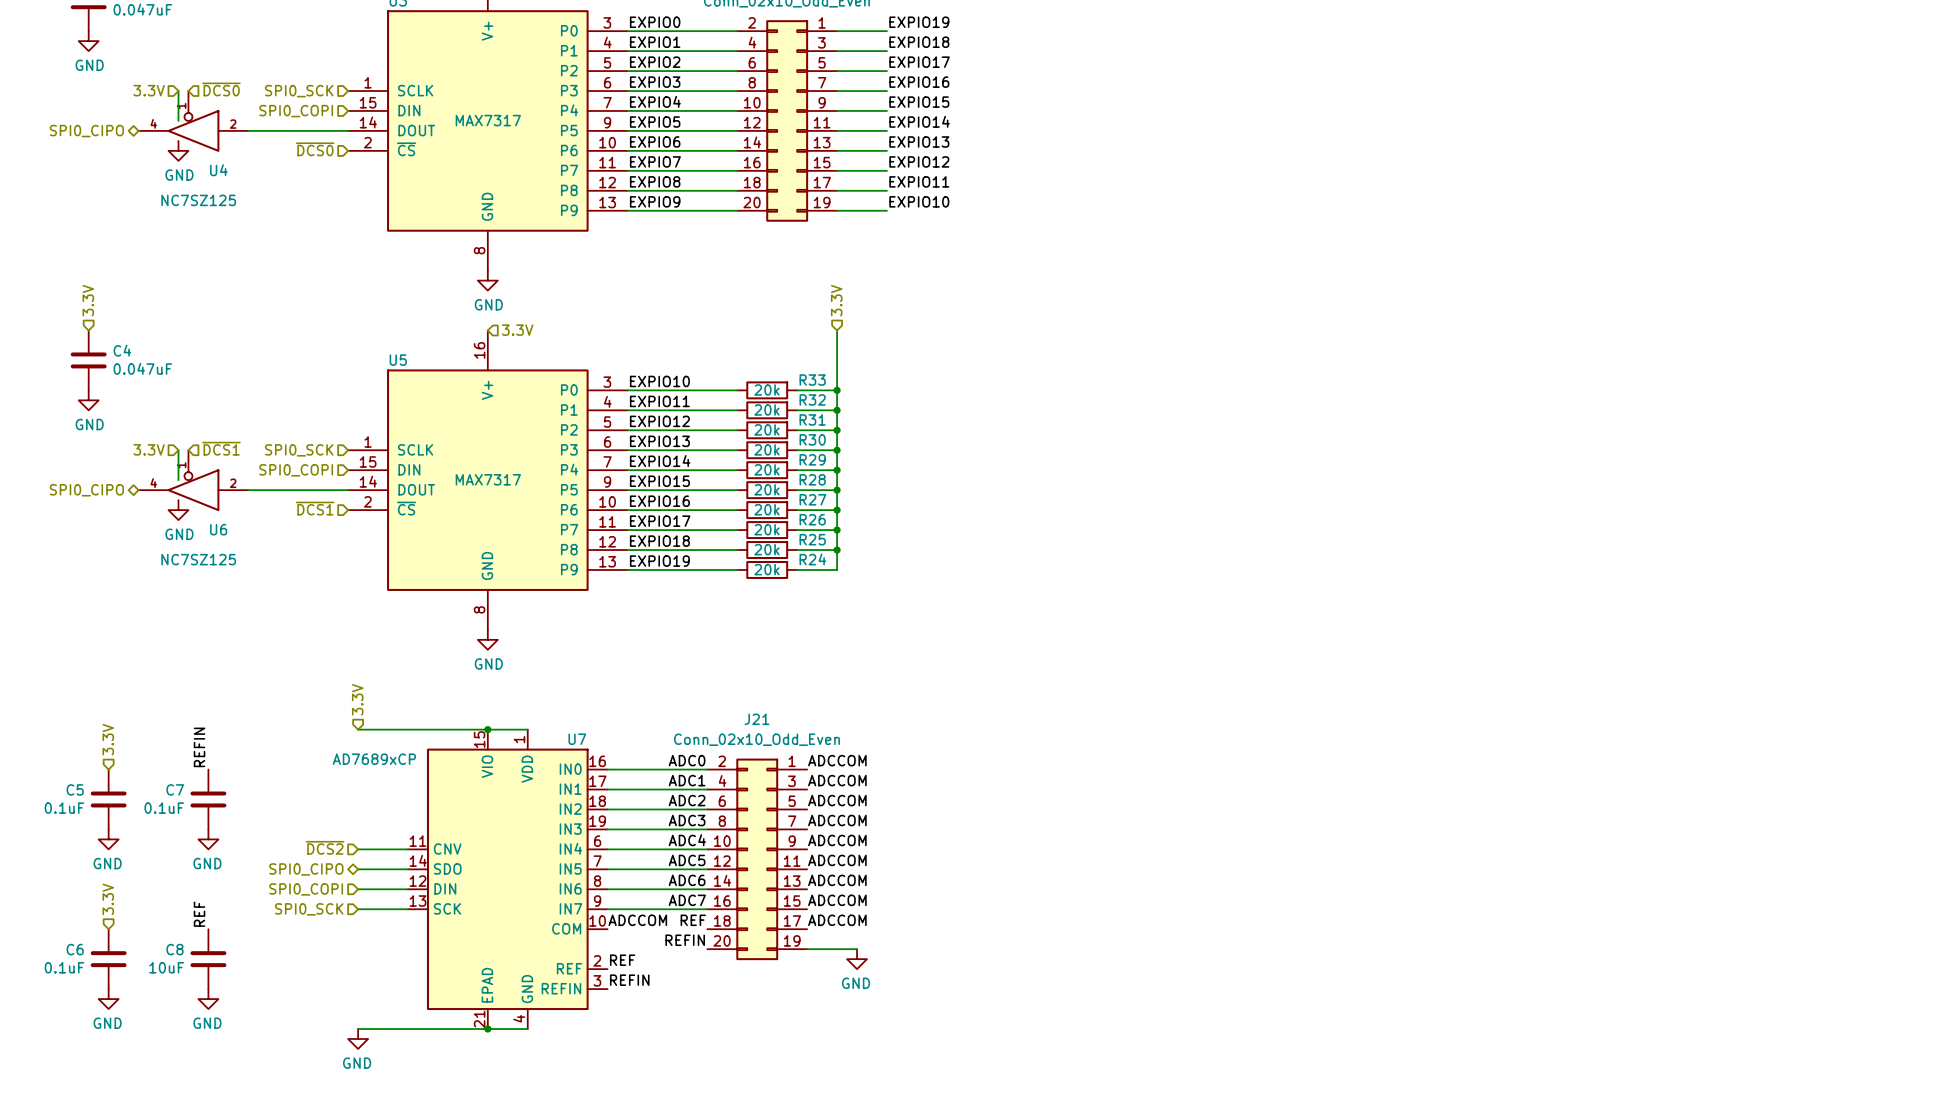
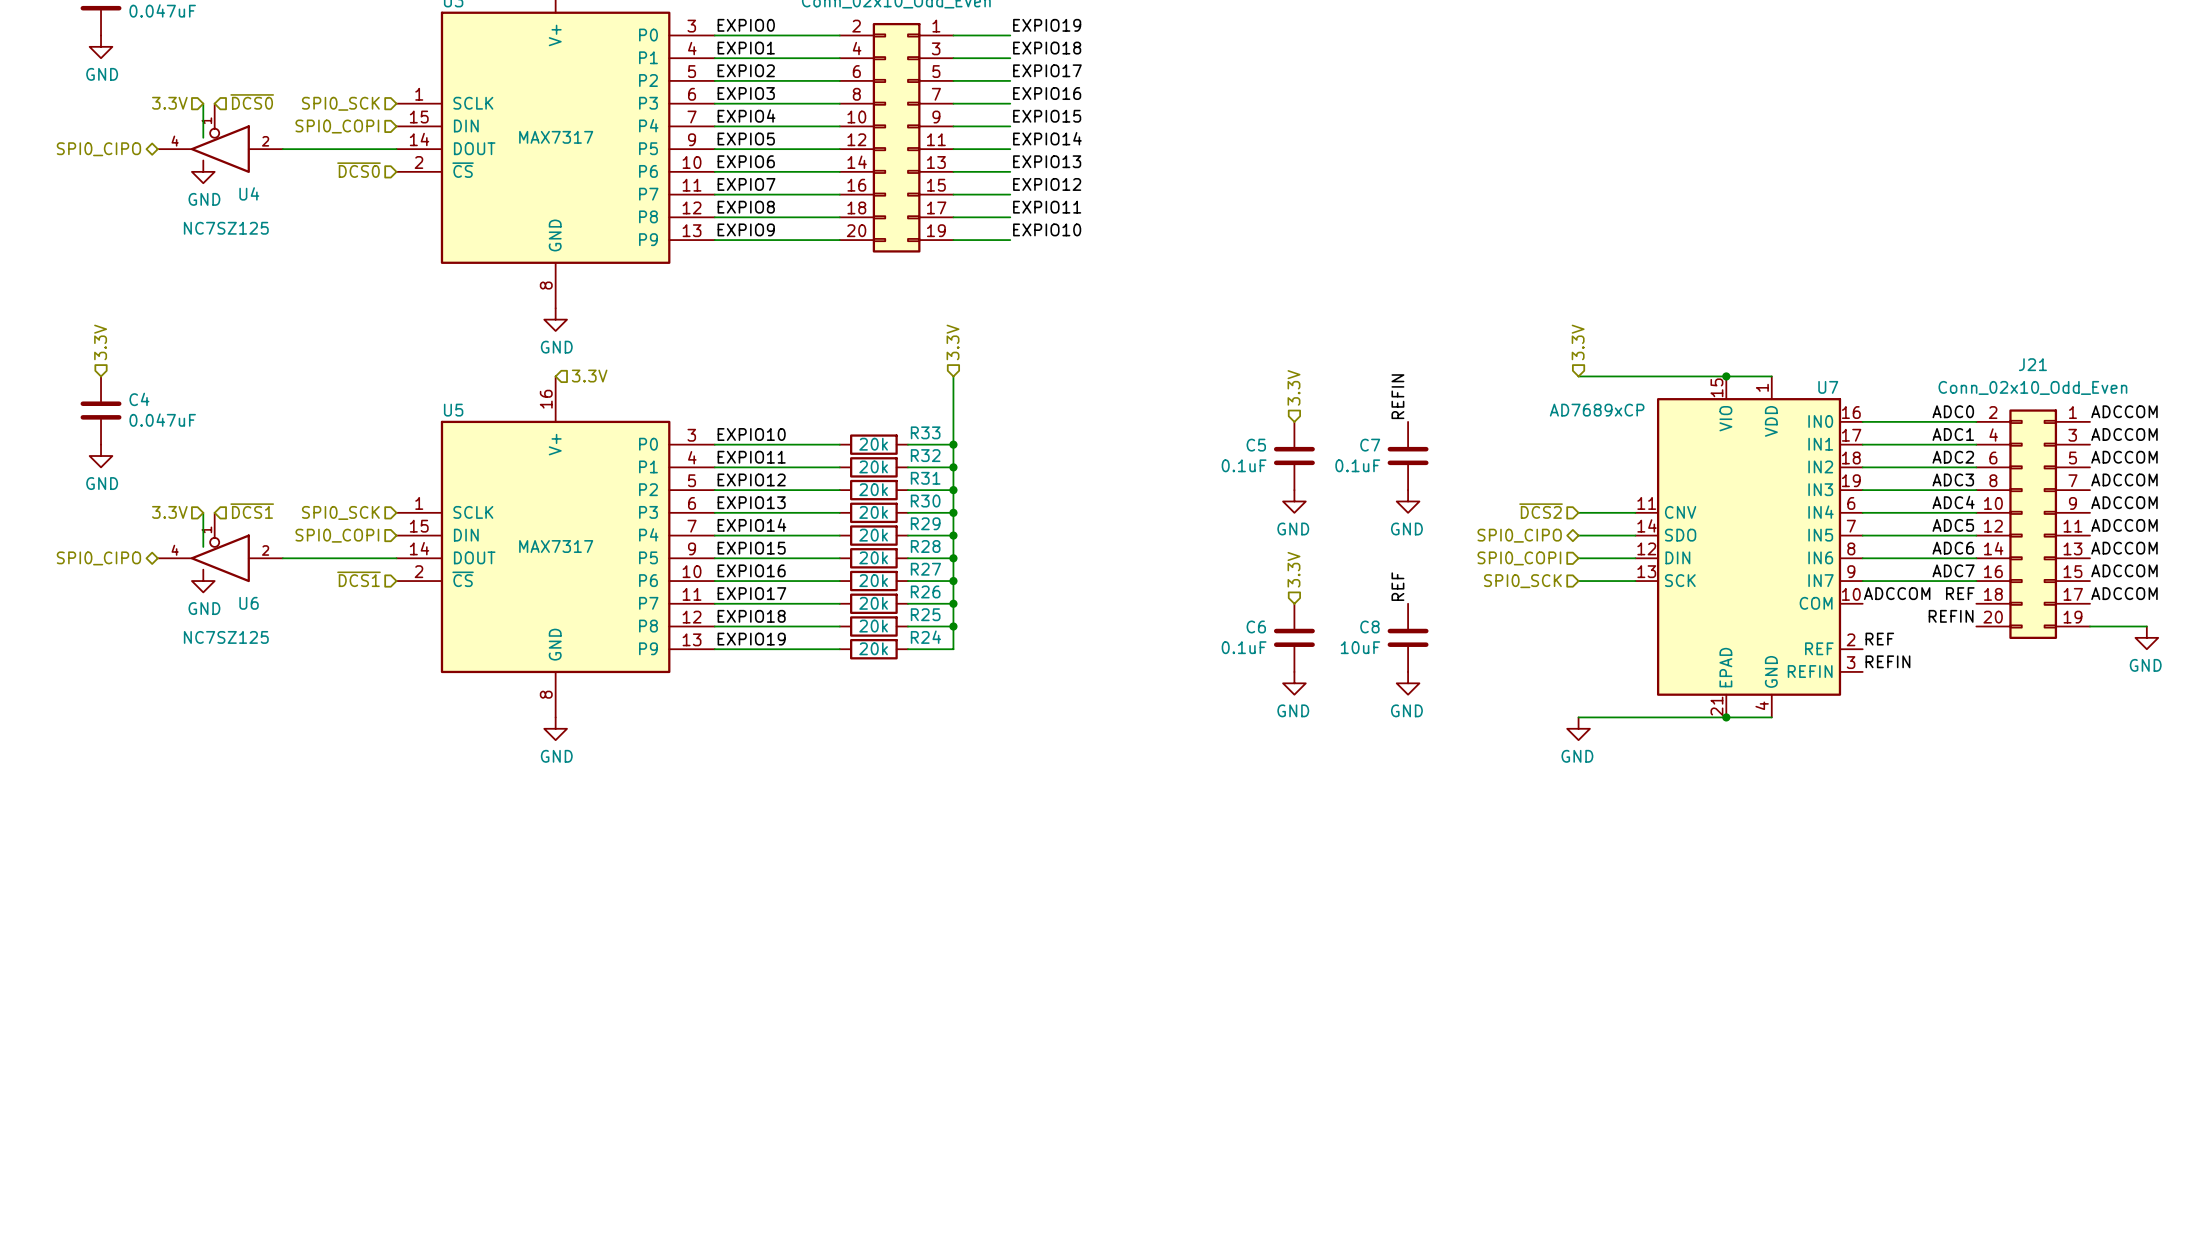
hierarchical label: none -> 3.3V (1578, 342)
wire: none -> (1578, 376) (1771, 376)
junction: none -> (1726, 376)
hierarchical label: none -> 3.3V (1293, 387)
label: none -> REFIN (1397, 396)
label: none -> ADC0 (1953, 411)
label: none -> ADCCOM (2124, 411)
wire: none -> (1862, 421) (1976, 421)
label: none -> ADC1 (1953, 434)
label: none -> ADCCOM (2124, 434)
wire: none -> (1862, 444) (1976, 444)
label: none -> ADC2 (1953, 457)
label: none -> ADCCOM (2124, 457)
wire: none -> (1862, 467) (1976, 467)
label: none -> ADC3 (1953, 479)
label: none -> ADCCOM (2124, 479)
wire: none -> (1862, 490) (1976, 490)
power symbol: none -> GND (1294, 501)
power symbol: none -> GND (1408, 501)
label: none -> ADC4 (1953, 502)
label: none -> ADCCOM (2124, 502)
hierarchical label: none -> ~{DCS2} (1541, 511)
wire: none -> (1578, 512) (1635, 512)
wire: none -> (1862, 512) (1976, 512)
label: none -> ADC5 (1953, 525)
label: none -> ADCCOM (2124, 525)
hierarchical label: none -> SPI0_CIPO (1519, 535)
wire: none -> (1578, 535) (1635, 535)
wire: none -> (1862, 535) (1976, 535)
label: none -> ADC6 (1953, 548)
label: none -> ADCCOM (2124, 548)
hierarchical label: none -> SPI0_COPI (1519, 558)
wire: none -> (1578, 558) (1635, 558)
wire: none -> (1862, 558) (1976, 558)
hierarchical label: none -> 3.3V (1293, 569)
label: none -> ADC7 (1953, 570)
label: none -> ADCCOM (2124, 570)
hierarchical label: none -> SPI0_SCK (1522, 581)
wire: none -> (1578, 581) (1635, 581)
wire: none -> (1862, 581) (1976, 581)
label: none -> REF (1397, 586)
label: none -> ADCCOM (1897, 593)
label: none -> REF (1960, 593)
label: none -> ADCCOM (2124, 593)
label: none -> REFIN (1951, 616)
wire: none -> (2090, 626) (2146, 626)
power symbol: none -> GND (2146, 637)
label: none -> REF (1879, 639)
label: none -> REFIN (1887, 661)
power symbol: none -> GND (1294, 683)
power symbol: none -> GND (1408, 683)
wire: none -> (1578, 717) (1771, 717)
junction: none -> (1726, 717)
power symbol: none -> GND (1578, 728)
hierarchical label: 3.3V (357, 699) -> none
wire: (358, 729) (527, 729) -> none
junction: (487, 729) -> none
hierarchical label: 3.3V (108, 739) -> none
label: REFIN (199, 747) -> none
label: ADC0 (687, 760) -> none
label: ADCCOM (837, 760) -> none
wire: (607, 769) (707, 769) -> none
label: ADC1 (687, 780) -> none
label: ADCCOM (837, 780) -> none
wire: (607, 789) (707, 789) -> none
C5 position: (108, 799) -> (1294, 456)
C7 position: (208, 799) -> (1408, 456)
label: ADC2 (687, 800) -> none
label: ADCCOM (837, 800) -> none
wire: (607, 809) (707, 809) -> none
label: ADC3 (687, 820) -> none
label: ADCCOM (837, 820) -> none
wire: (607, 829) (707, 829) -> none
power symbol: GND (108, 839) -> none
power symbol: GND (208, 839) -> none
label: ADC4 (687, 840) -> none
label: ADCCOM (837, 840) -> none
hierarchical label: ~{DCS2} (325, 847) -> none
wire: (358, 849) (407, 849) -> none
wire: (607, 849) (707, 849) -> none
J21 position: (757, 859) -> (2033, 524)
label: ADC5 (687, 860) -> none
label: ADCCOM (837, 860) -> none
hierarchical label: SPI0_CIPO (306, 869) -> none
wire: (358, 869) (407, 869) -> none
wire: (607, 869) (707, 869) -> none
U7 position: (507, 879) -> (1749, 546)
label: ADC6 (687, 880) -> none
label: ADCCOM (837, 880) -> none
hierarchical label: SPI0_COPI (306, 889) -> none
wire: (358, 889) (407, 889) -> none
wire: (607, 889) (707, 889) -> none
hierarchical label: 3.3V (108, 899) -> none
label: ADC7 (687, 900) -> none
label: ADCCOM (837, 900) -> none
hierarchical label: SPI0_SCK (309, 909) -> none
wire: (358, 909) (407, 909) -> none
wire: (607, 909) (707, 909) -> none
label: REF (199, 914) -> none
label: ADCCOM (637, 920) -> none
label: REF (693, 920) -> none
label: ADCCOM (837, 920) -> none
label: REFIN (685, 940) -> none
wire: (807, 949) (857, 949) -> none
C6 position: (108, 959) -> (1294, 637)
C8 position: (208, 959) -> (1408, 637)
power symbol: GND (857, 959) -> none
label: REF (622, 960) -> none
label: REFIN (629, 980) -> none
power symbol: GND (108, 999) -> none
power symbol: GND (208, 999) -> none
wire: (358, 1029) (527, 1029) -> none
junction: (487, 1029) -> none
power symbol: GND (358, 1038) -> none

